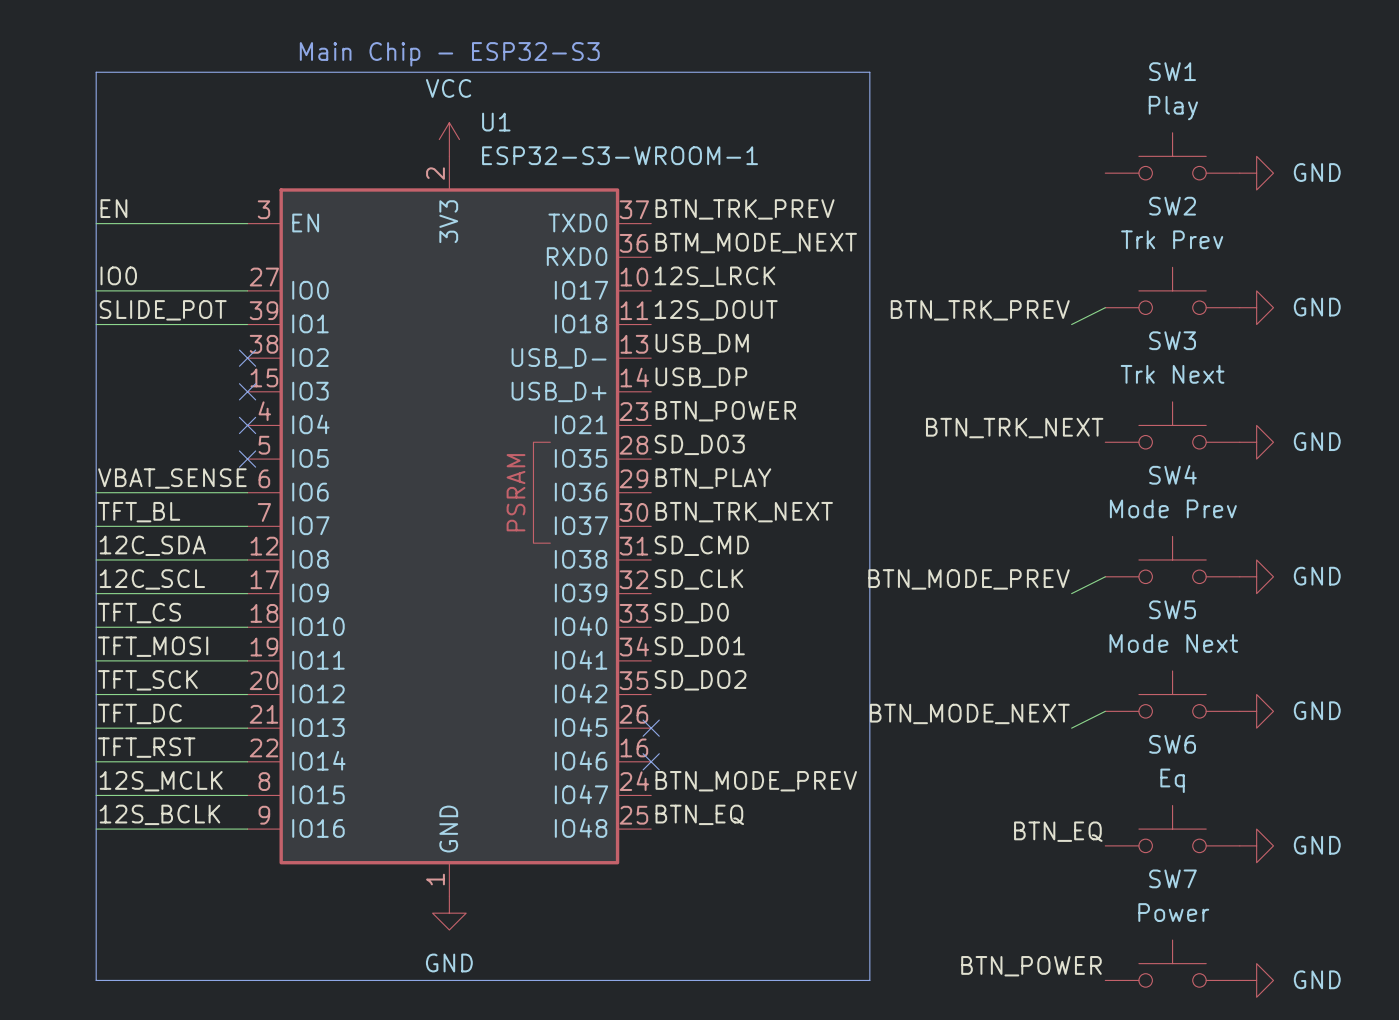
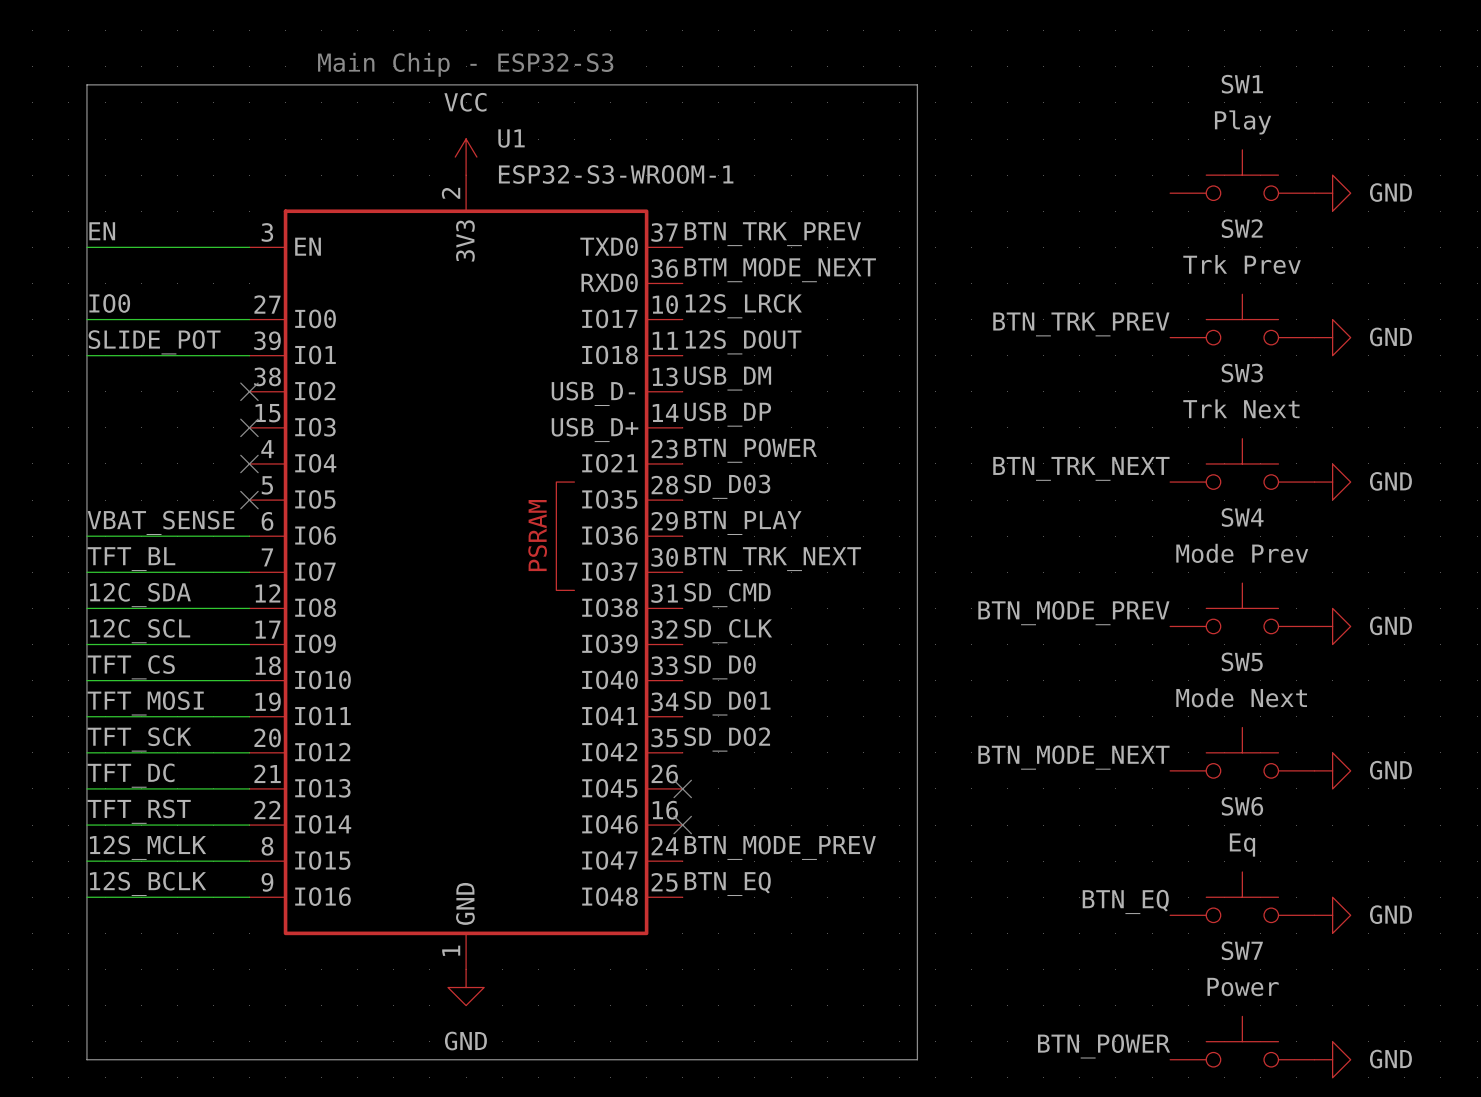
wire: (1105, 307) (1071, 324) -> none
label position: BTN_TRK_PREV (980, 310) -> BTN_TRK_PREV (1081, 324)
wire: (1105, 576) (1071, 593) -> none
label position: BTN_MODE_PREV (969, 579) -> BTN_MODE_PREV (1073, 613)
wire: (1105, 711) (1071, 728) -> none
label position: BTN_MODE_NEXT (969, 713) -> BTN_MODE_NEXT (1073, 757)

